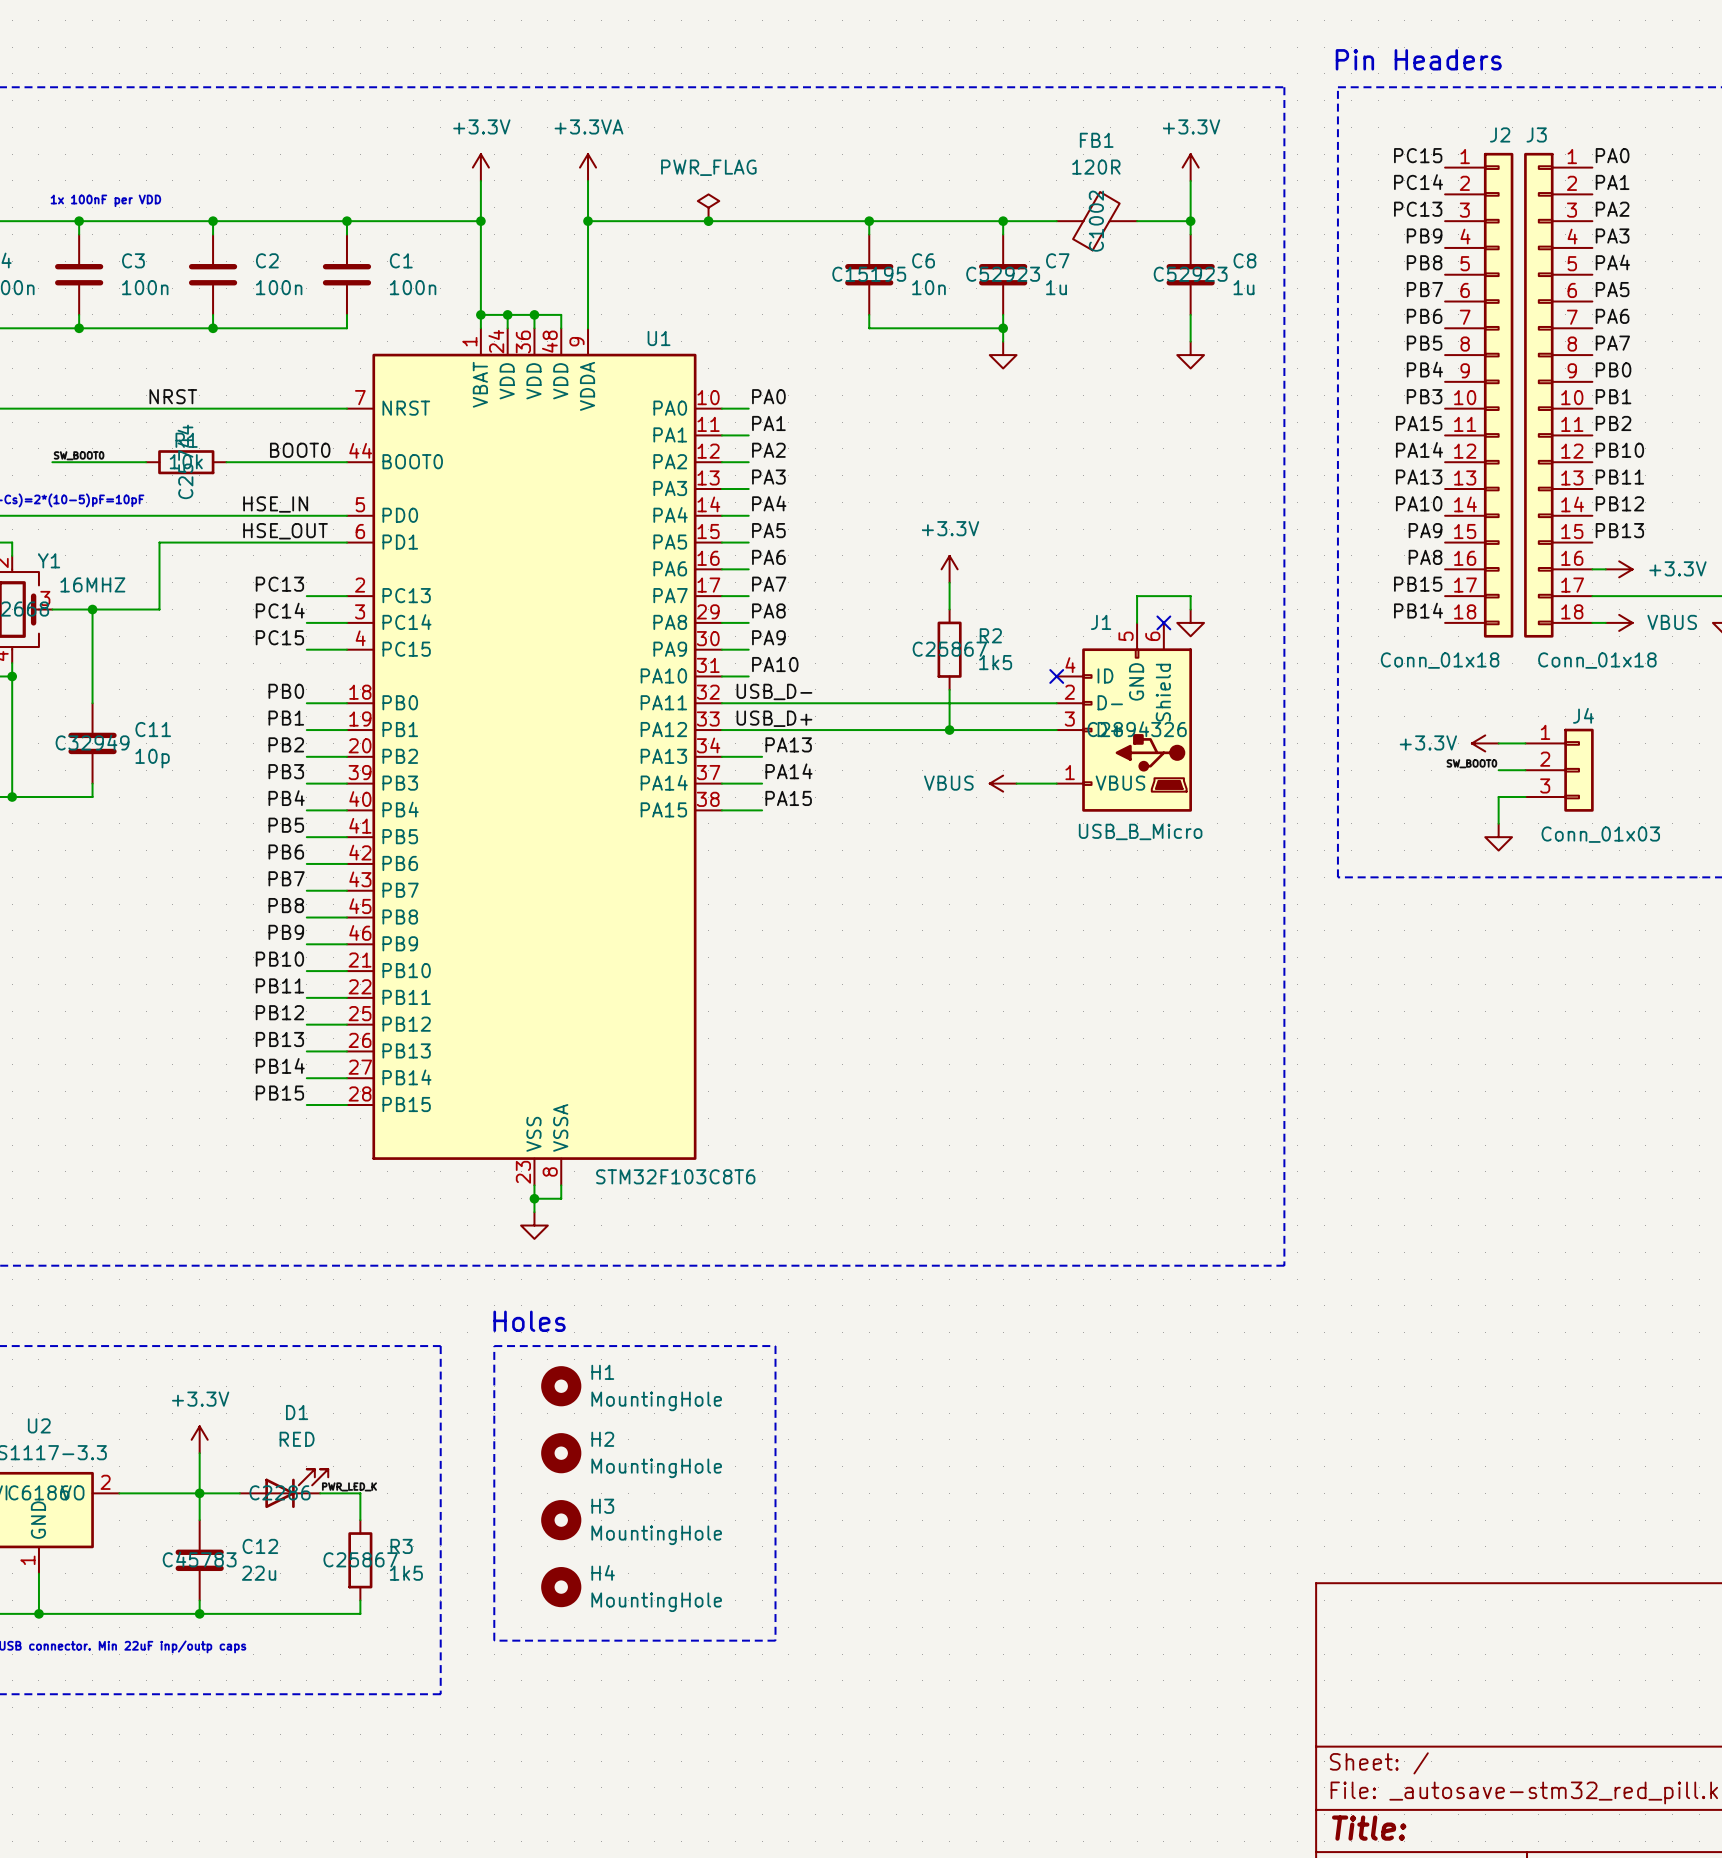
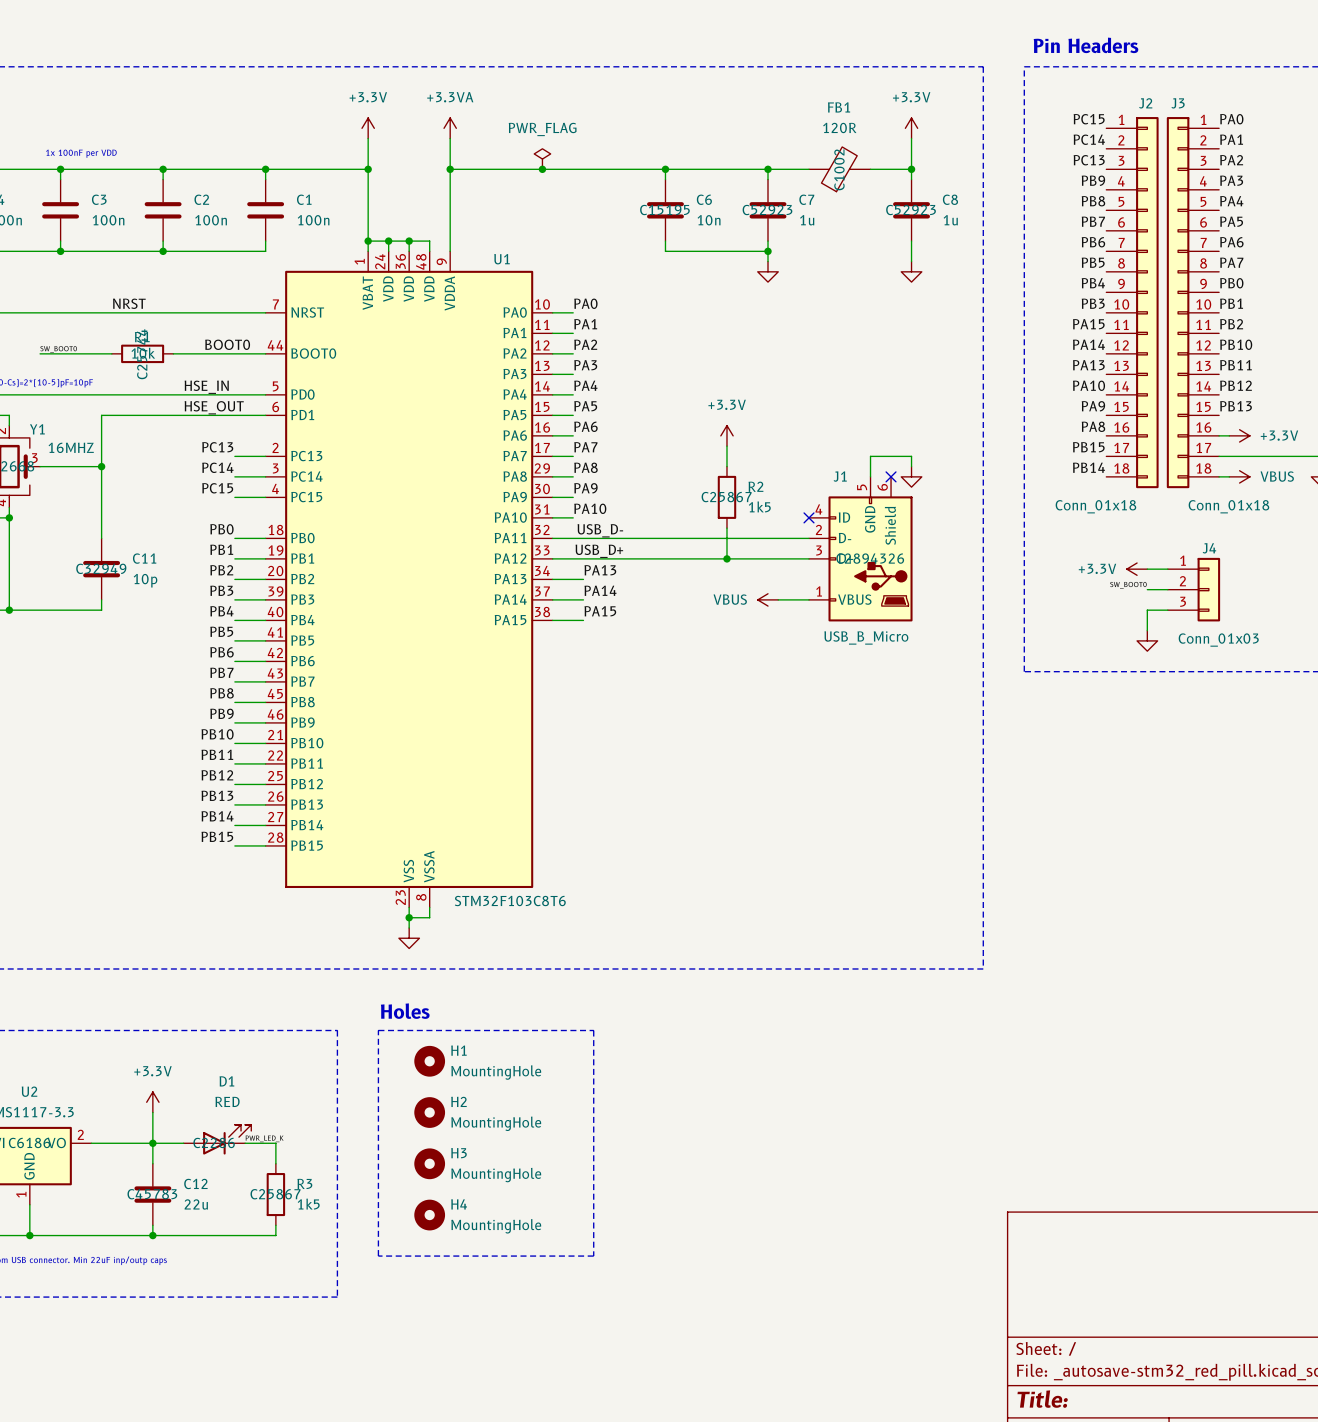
wire: (159, 542) (159, 609) (132, 609) -> (122, 415) (101, 415) (101, 538)
wire: (92, 609) (92, 703) -> none
junction position: (92, 609) -> (101, 466)
C11 position: (92, 743) -> (101, 569)
wire: (92, 783) (92, 797) -> (101, 599) (101, 610) (70, 610)

